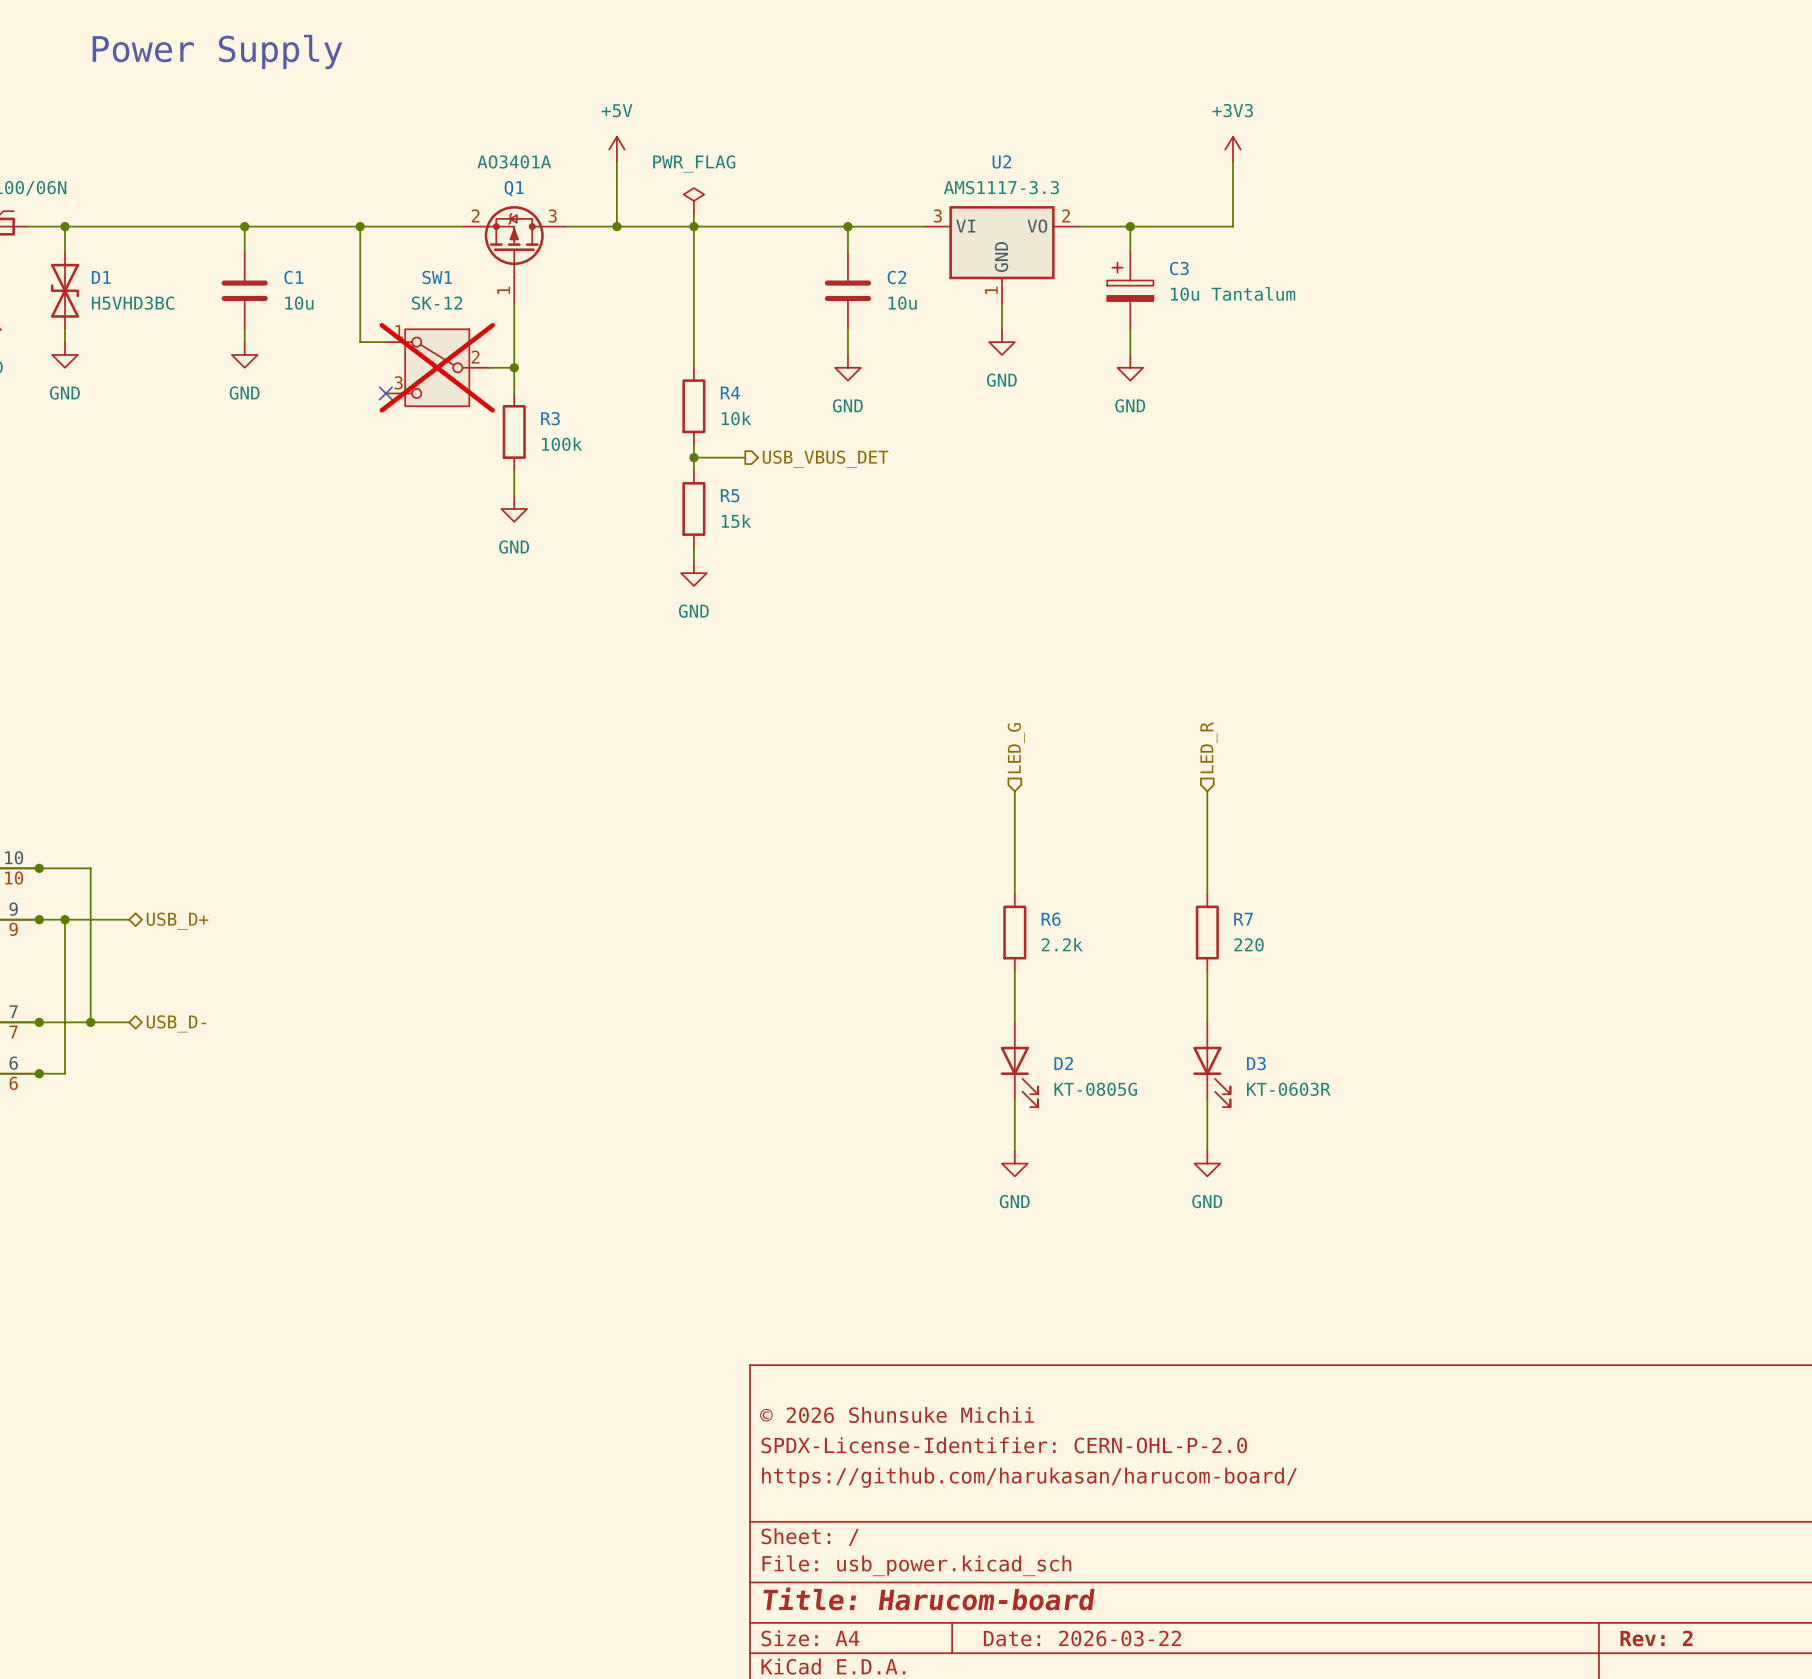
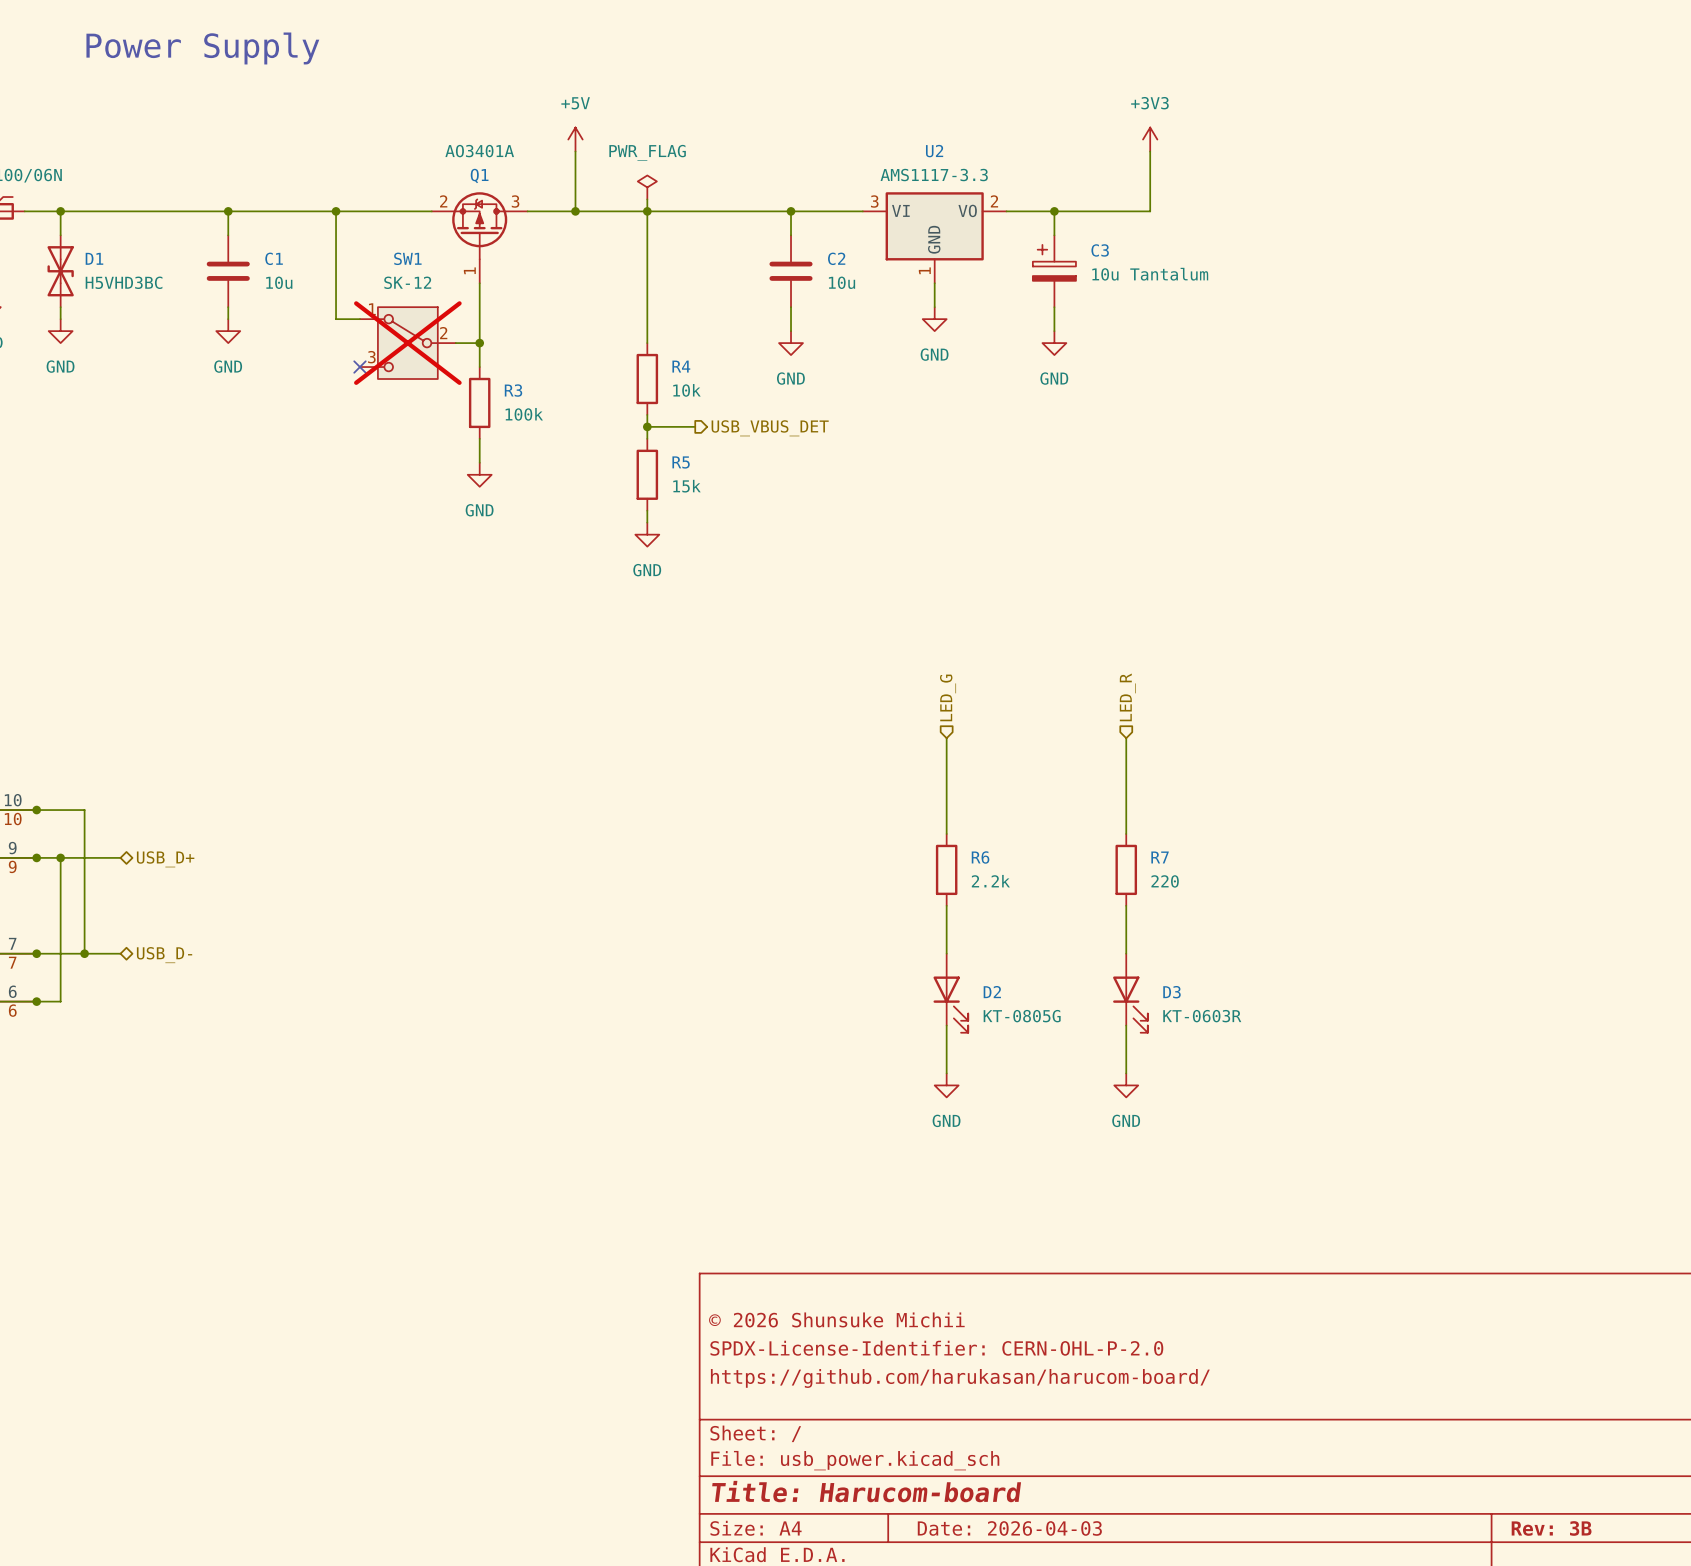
title block: Date: 2026-03-22 (1082, 1638) -> Date: 2026-04-03 (1009, 1528)
title block: Rev: 2 (1656, 1638) -> Rev: 3B (1551, 1528)

